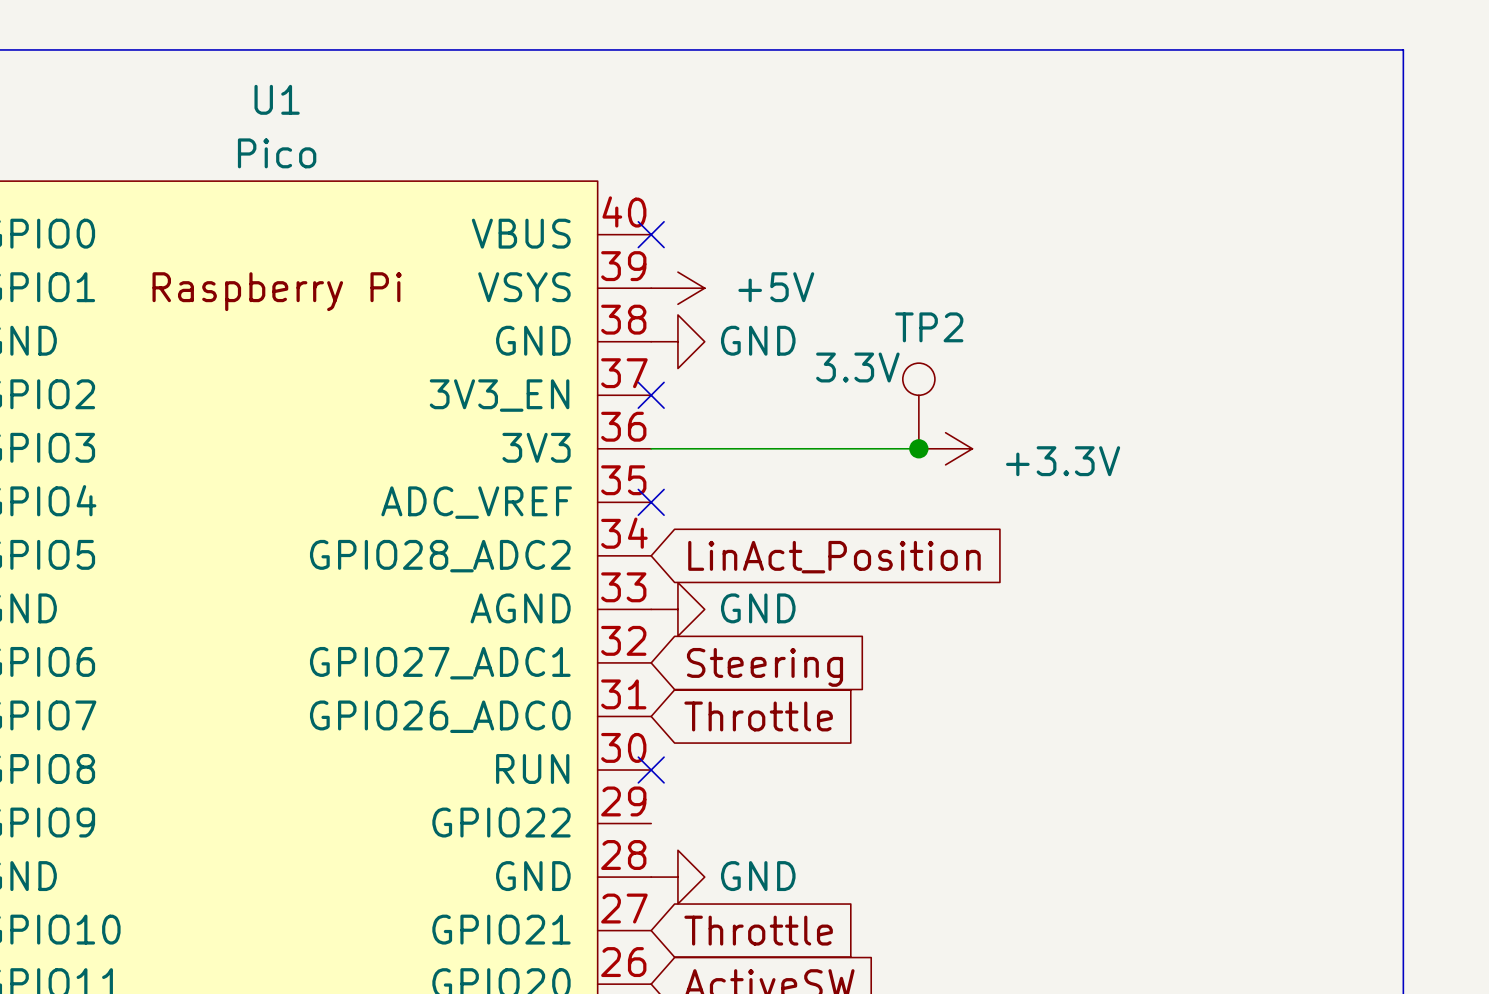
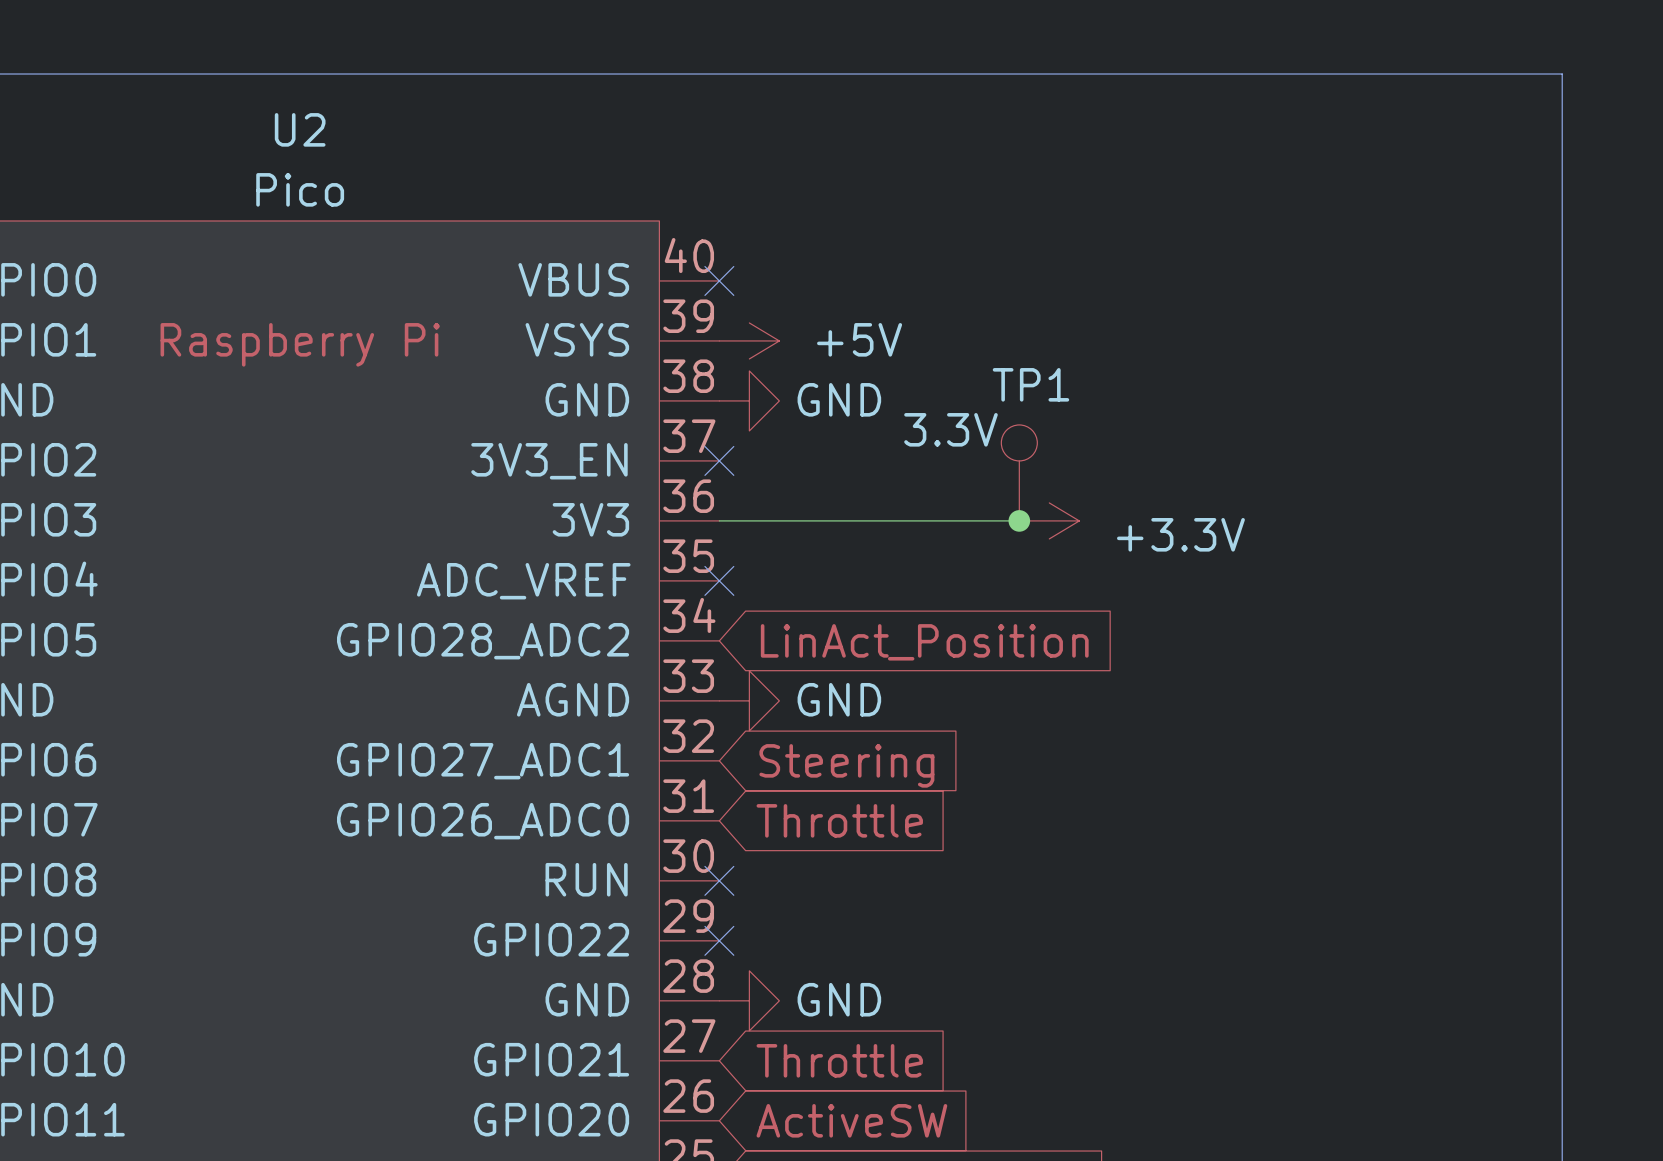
U1 name: U1 (277, 99) -> U2 (300, 129)
TP2 name: TP2 (929, 327) -> TP1 (1030, 384)
no-connect mark: none -> (719, 940)

